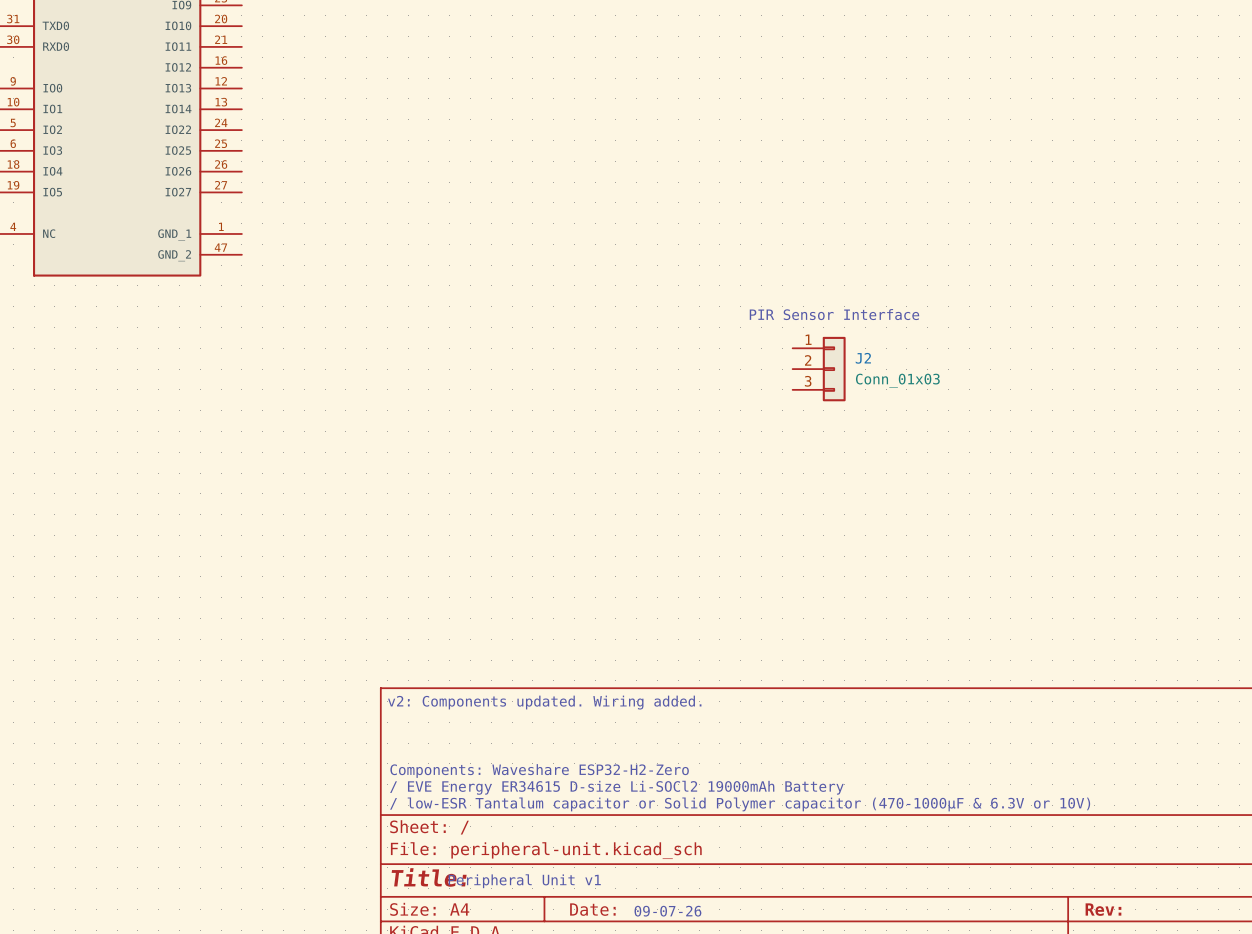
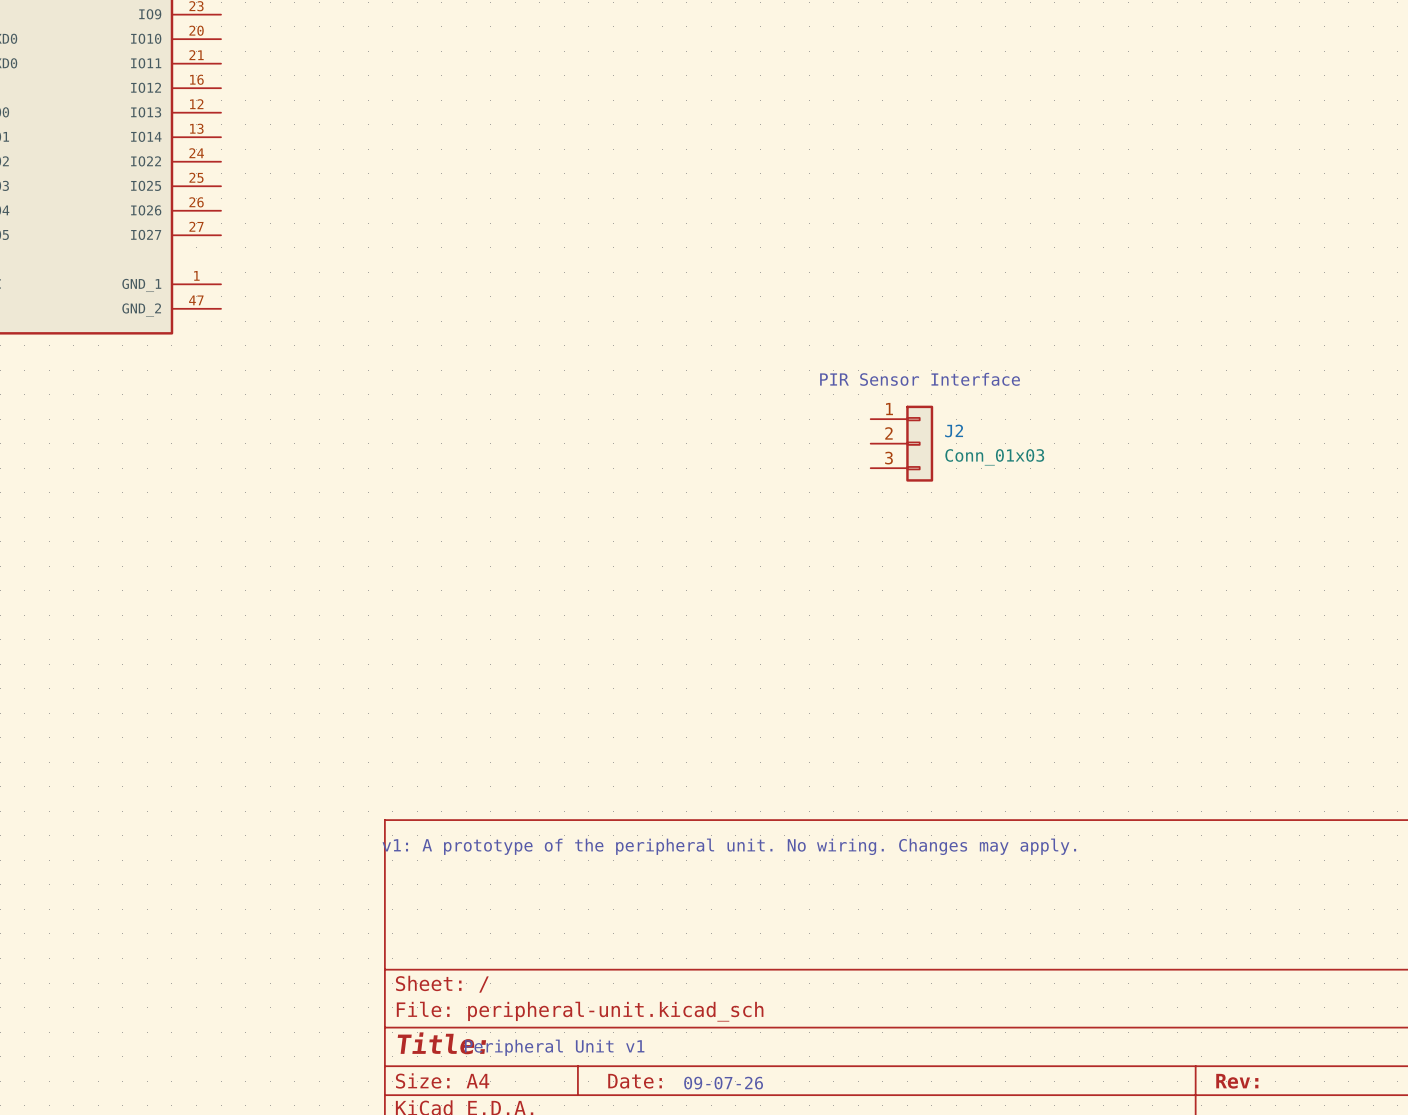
text: v2: Components updated. Wiring added. (544, 702) -> none
text: none -> v1: A prototype of the peripheral unit. No wiring. Changes may apply. (729, 846)
text: Components: Waveshare ESP32-H2-Zero (539, 771) -> none
text: / EVE Energy ER34615 D-size Li-SOCl2 19000mAh Battery (616, 787) -> none
text: / low-ESR Tantalum capacitor or Solid Polymer capacitor (470-1000μF & 6.3V or 10V) (740, 804) -> none

